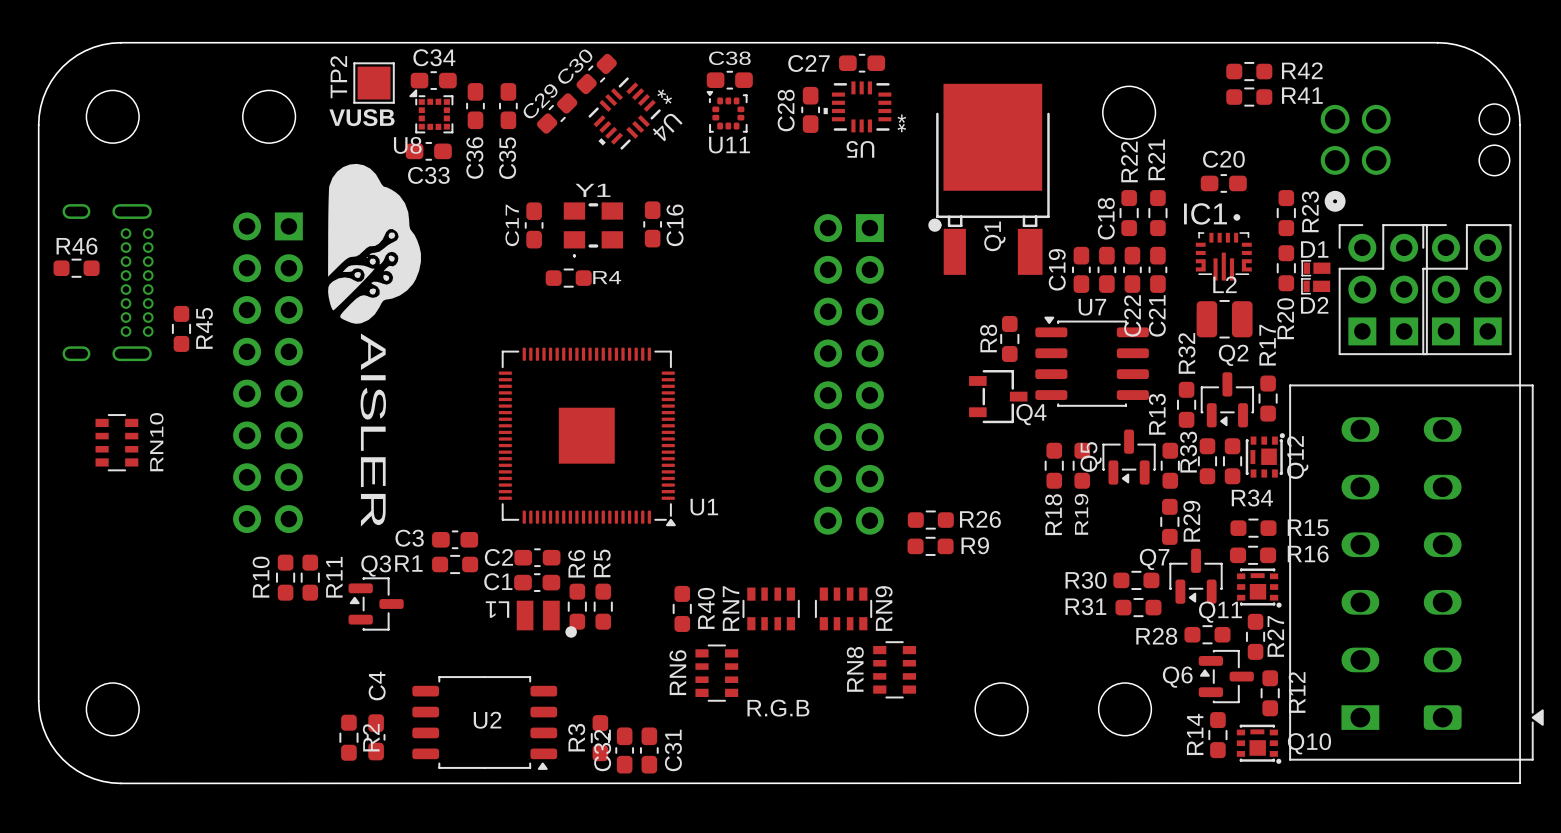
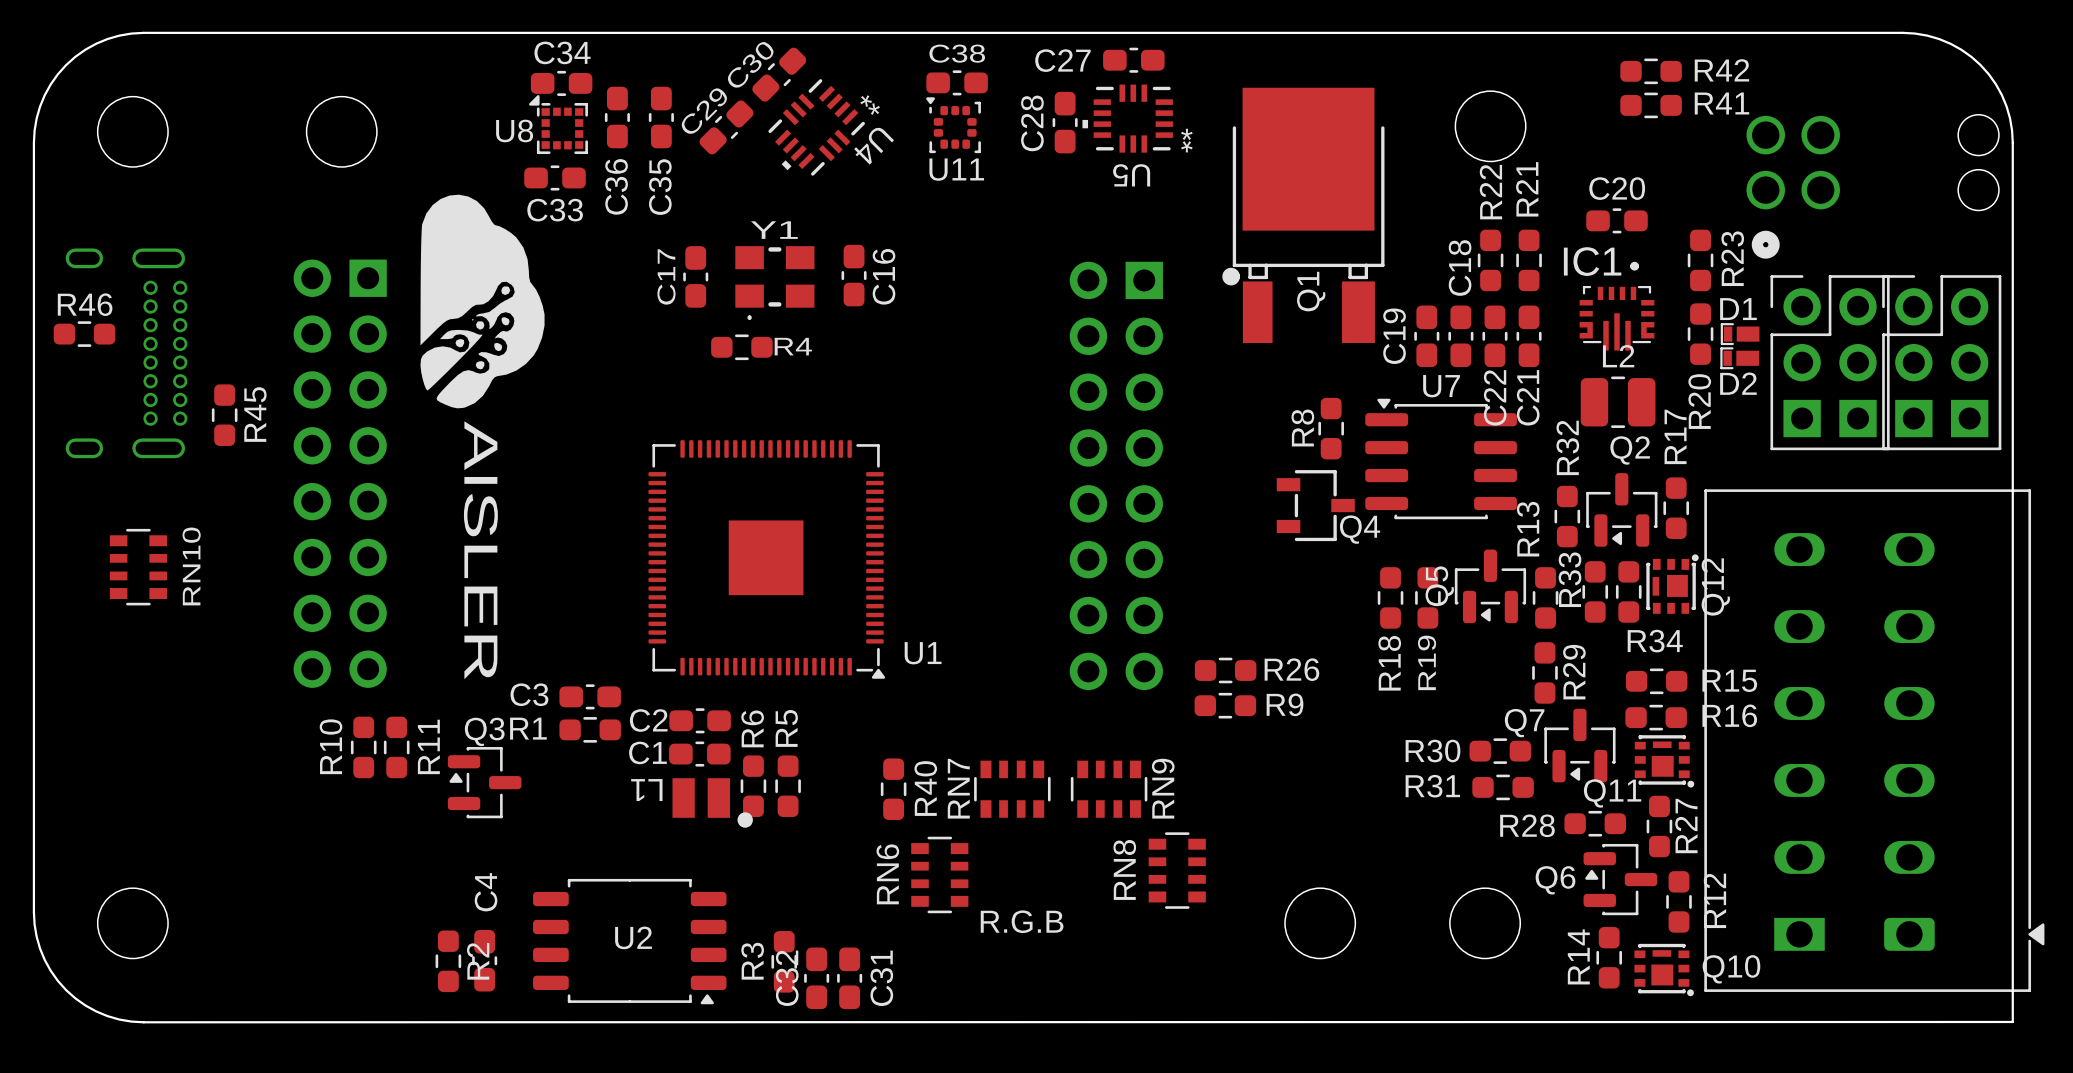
TP2: (374, 83) -> none
text: VUSB (361, 117) -> none
U8 name position: U8 (407, 145) -> U8 (514, 130)

